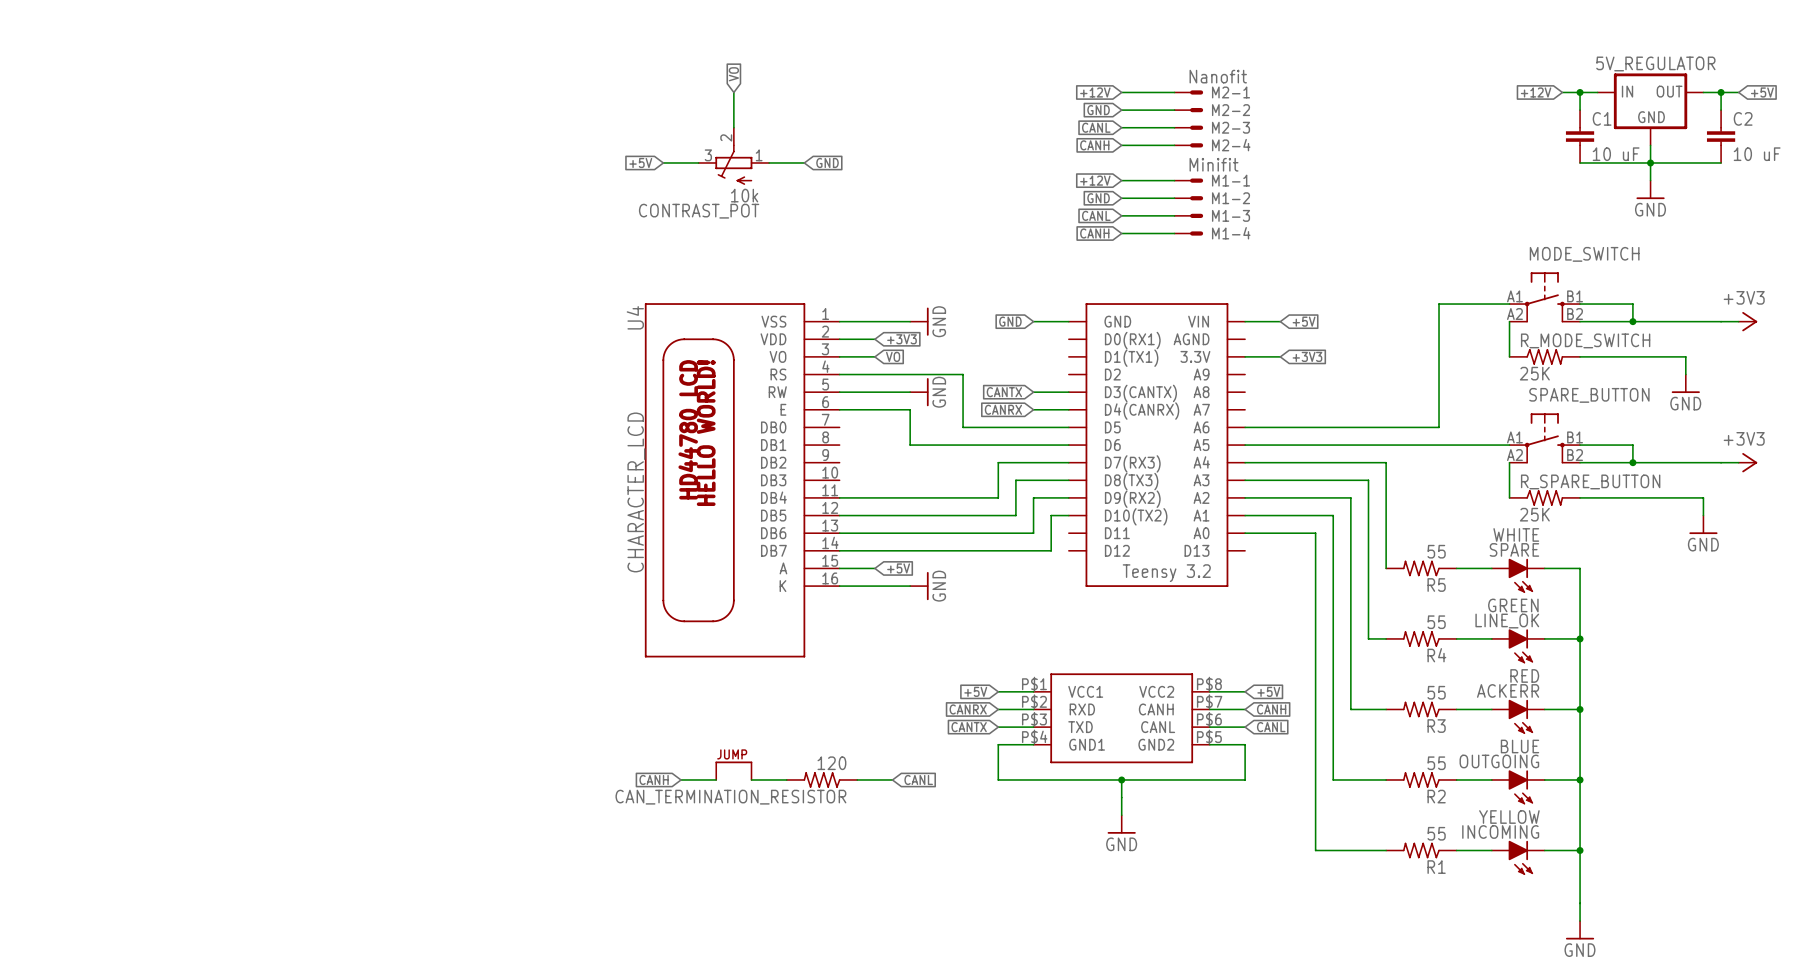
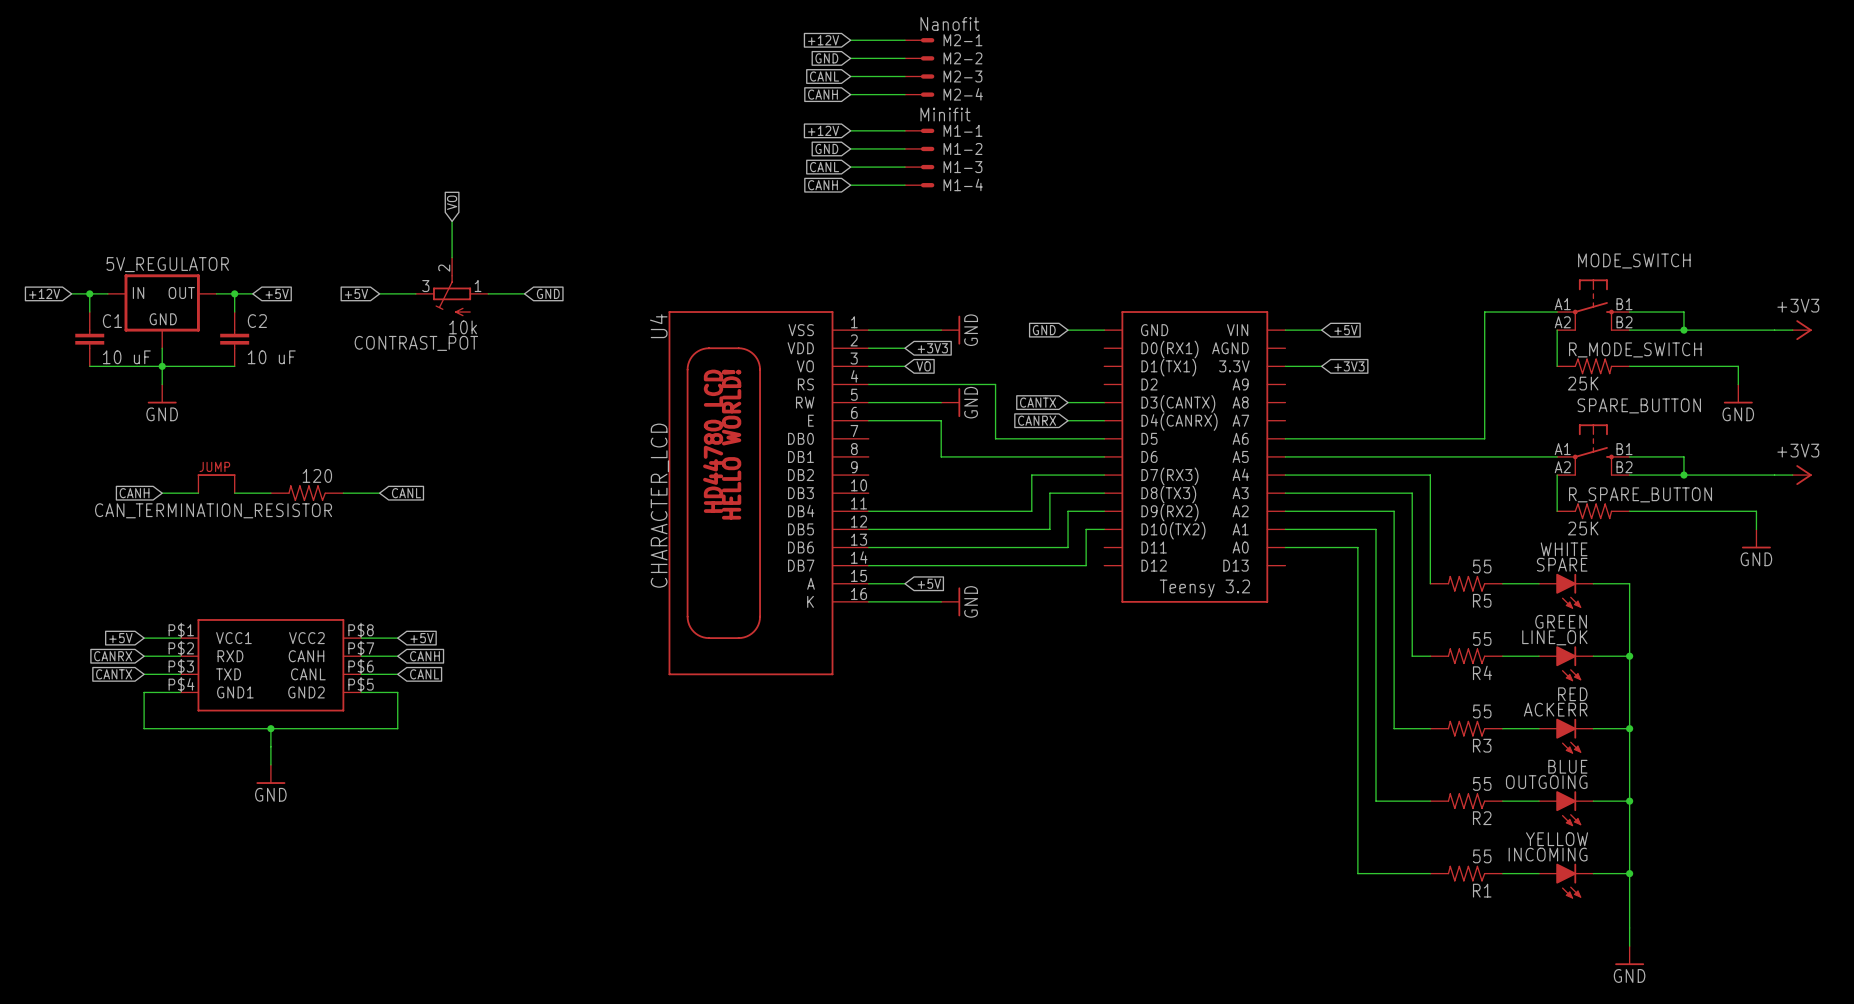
global label: none -> +12V (823, 40)
wire: none -> (850, 40) (904, 40)
global label: none -> GND (826, 58)
wire: none -> (850, 58) (904, 58)
global label: VO (733, 74) -> none
global label: none -> CANL (824, 76)
wire: none -> (850, 76) (904, 76)
wire: (733, 92) (733, 127) -> none
global label: none -> CANH (822, 94)
wire: none -> (850, 94) (904, 94)
global label: +12V (1095, 92) -> none
wire: (1121, 92) (1174, 92) -> none
M2-1 position: (1188, 92) -> (919, 40)
global label: +12V (1536, 92) -> none
wire: (1562, 92) (1597, 92) -> none
wire: (1580, 92) (1580, 110) -> none
junction: (1580, 92) -> none
wire: (1703, 92) (1738, 92) -> none
wire: (1721, 92) (1721, 110) -> none
junction: (1721, 92) -> none
global label: +5V (1762, 92) -> none
5V_REGULATOR position: (1650, 109) -> (162, 311)
global label: GND (1098, 110) -> none
wire: (1121, 110) (1174, 110) -> none
M2-2 position: (1188, 110) -> (919, 58)
global label: none -> +12V (823, 130)
wire: none -> (850, 130) (904, 130)
global label: CANL (1096, 127) -> none
wire: (1121, 127) (1174, 127) -> none
M2-3 position: (1188, 127) -> (919, 76)
C1 position: (1580, 136) -> (89, 339)
C2 position: (1721, 136) -> (234, 339)
wire: none -> (850, 148) (904, 148)
global label: CANH (1094, 145) -> none
wire: (1121, 145) (1174, 145) -> none
M2-4 position: (1188, 145) -> (919, 94)
wire: (1650, 145) (1650, 180) -> none
CONTRAST_POT: 10k (733, 156) -> none
global label: +5V (640, 162) -> none
wire: (663, 162) (698, 162) -> none
wire: (769, 162) (804, 162) -> none
global label: none -> CANL (824, 167)
wire: none -> (850, 167) (904, 167)
global label rotation: 0° (827, 162) -> 180° (826, 148)
wire: (1580, 162) (1721, 162) -> none
junction: (1650, 162) -> none
global label: none -> CANH (822, 185)
wire: none -> (850, 185) (904, 185)
global label: +12V (1095, 180) -> none
wire: (1121, 180) (1174, 180) -> none
M1-1 position: (1188, 180) -> (919, 130)
power symbol: GND (1650, 189) -> none
global label: none -> VO (452, 202)
global label: GND (1098, 198) -> none
wire: (1121, 198) (1174, 198) -> none
M1-2 position: (1188, 198) -> (919, 148)
wire: none -> (452, 221) (452, 257)
global label: CANL (1096, 215) -> none
wire: (1121, 215) (1174, 215) -> none
M1-3 position: (1188, 215) -> (919, 167)
global label: CANH (1094, 233) -> none
wire: (1121, 233) (1174, 233) -> none
M1-4 position: (1188, 233) -> (919, 185)
CONTRAST_POT: none -> 10k (452, 286)
global label: none -> +12V (44, 293)
wire: none -> (71, 293) (107, 293)
wire: none -> (89, 293) (89, 312)
junction: none -> (89, 293)
wire: none -> (216, 293) (252, 293)
wire: none -> (234, 293) (234, 312)
junction: none -> (234, 293)
global label: none -> +5V (277, 293)
global label: none -> +5V (356, 293)
wire: none -> (379, 293) (415, 293)
wire: none -> (488, 293) (524, 293)
global label: none -> GND (548, 293)
wire: none -> (162, 348) (162, 384)
wire: none -> (89, 366) (234, 366)
junction: none -> (162, 366)
power symbol: none -> GND (162, 393)
part: none -> (216, 483)
global label: none -> CANH (134, 493)
wire: none -> (162, 493) (198, 493)
wire: none -> (234, 493) (270, 493)
CAN_TERMINATION_RESISTOR: none -> 120 (307, 493)
wire: none -> (343, 493) (379, 493)
global label: none -> CANL (406, 493)
global label: none -> +5V (120, 638)
wire: none -> (144, 638) (180, 638)
wire: none -> (361, 638) (397, 638)
global label: none -> +5V (422, 638)
global label: none -> CANRX (113, 656)
wire: none -> (144, 656) (180, 656)
wire: none -> (361, 656) (397, 656)
global label: none -> CANH (424, 656)
part: none -> (270, 665)
global label: none -> CANTX (114, 674)
wire: none -> (144, 674) (180, 674)
wire: none -> (361, 674) (397, 674)
global label: none -> CANL (424, 674)
wire: none -> (180, 692) (144, 692) (144, 728) (397, 728) (397, 692) (361, 692)
global label: +5V (975, 691) -> none
wire: (998, 691) (1033, 691) -> none
wire: (1209, 691) (1245, 691) -> none
global label: +5V (1268, 691) -> none
wire: none -> (270, 728) (270, 764)
junction: none -> (270, 728)
global label: CANRX (968, 709) -> none
wire: (998, 709) (1033, 709) -> none
wire: (1209, 709) (1245, 709) -> none
global label: CANH (1271, 709) -> none
part: (1121, 718) -> none
global label: CANTX (969, 727) -> none
wire: (998, 727) (1033, 727) -> none
wire: (1209, 727) (1245, 727) -> none
global label: CANL (1271, 727) -> none
wire: (1033, 744) (998, 744) (998, 779) (1245, 779) (1245, 744) (1209, 744) -> none
power symbol: none -> GND (270, 774)
part: (733, 770) -> none
global label: CANH (654, 779) -> none
wire: (680, 779) (716, 779) -> none
wire: (751, 779) (786, 779) -> none
CAN_TERMINATION_RESISTOR: 120 (822, 779) -> none
wire: (857, 779) (892, 779) -> none
global label: CANL (918, 779) -> none
wire: (1121, 779) (1121, 815) -> none
junction: (1121, 779) -> none
power symbol: GND (1121, 824) -> none

